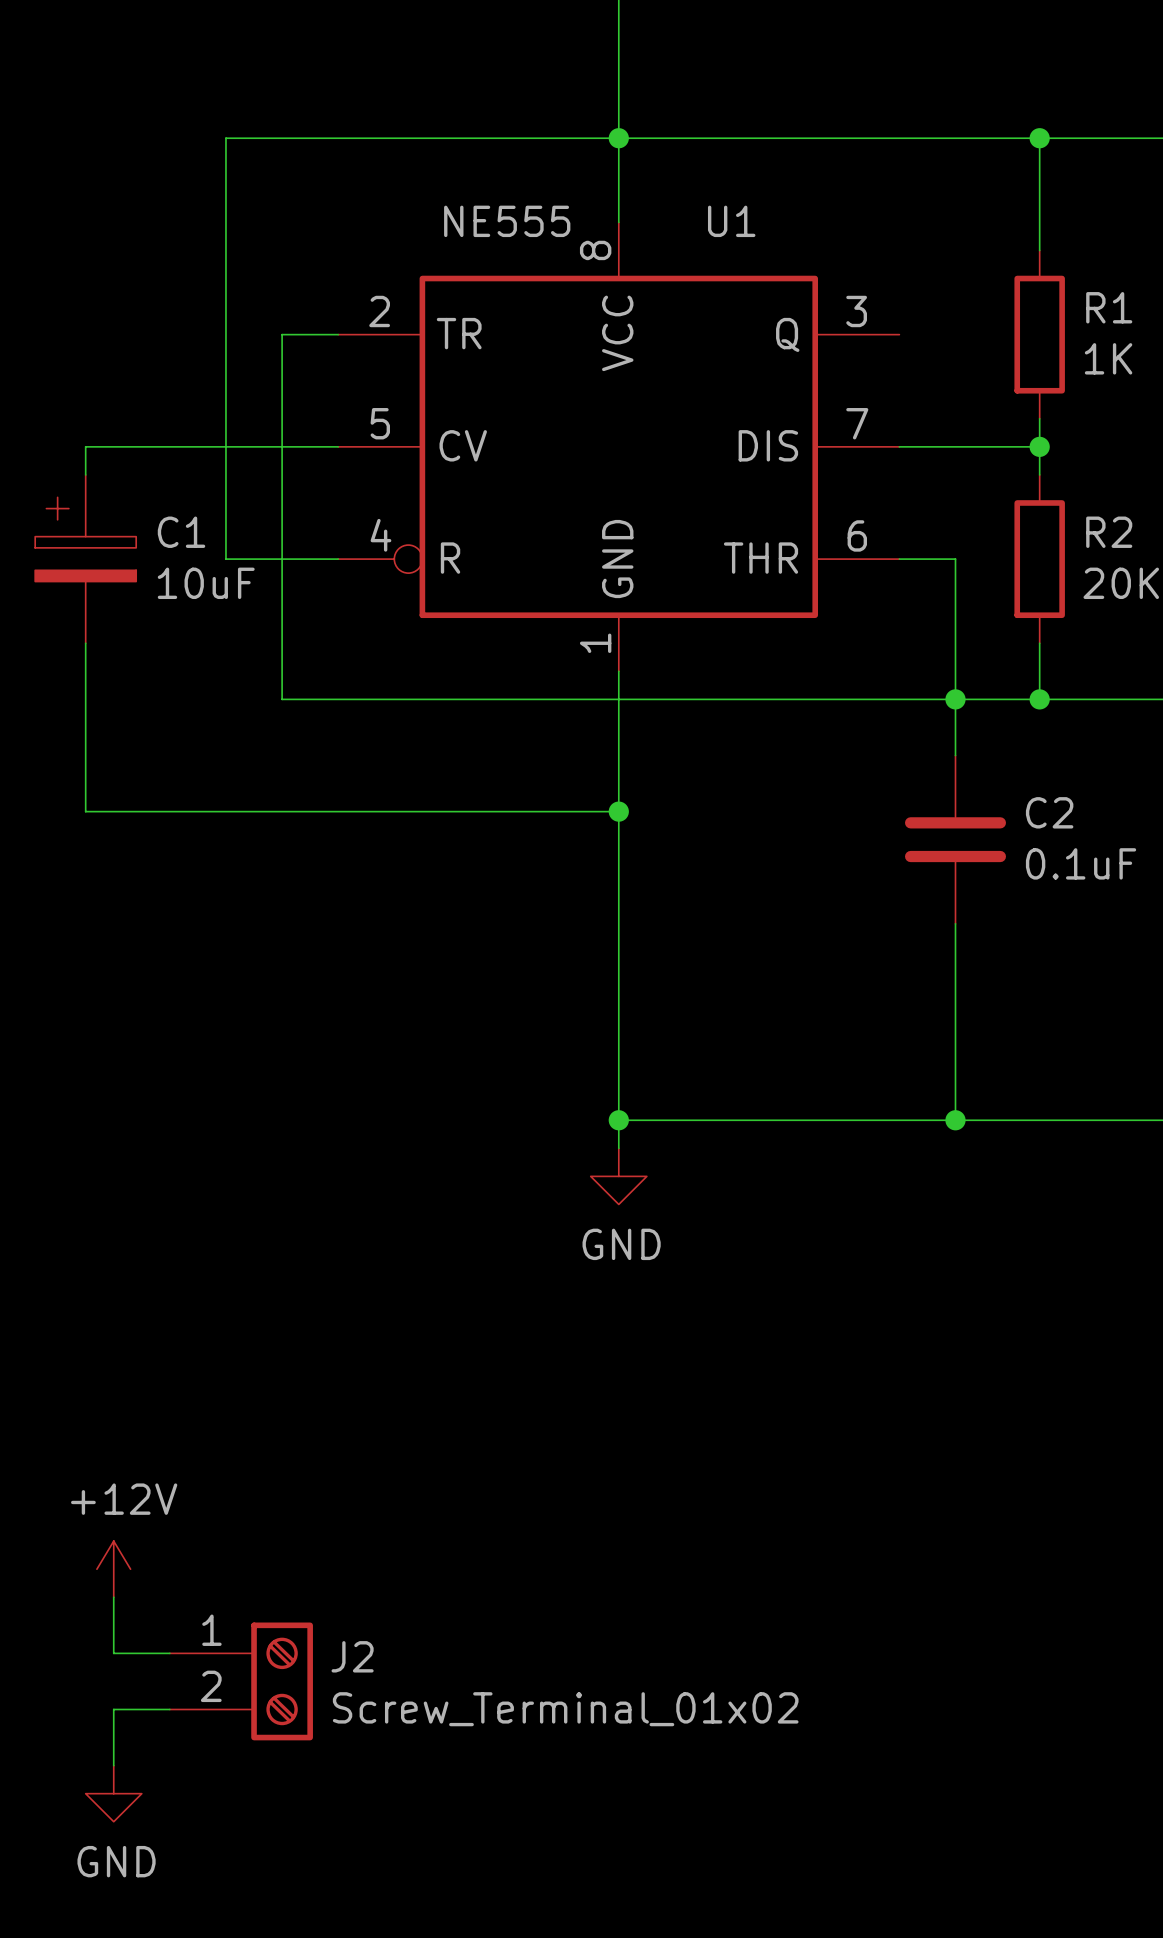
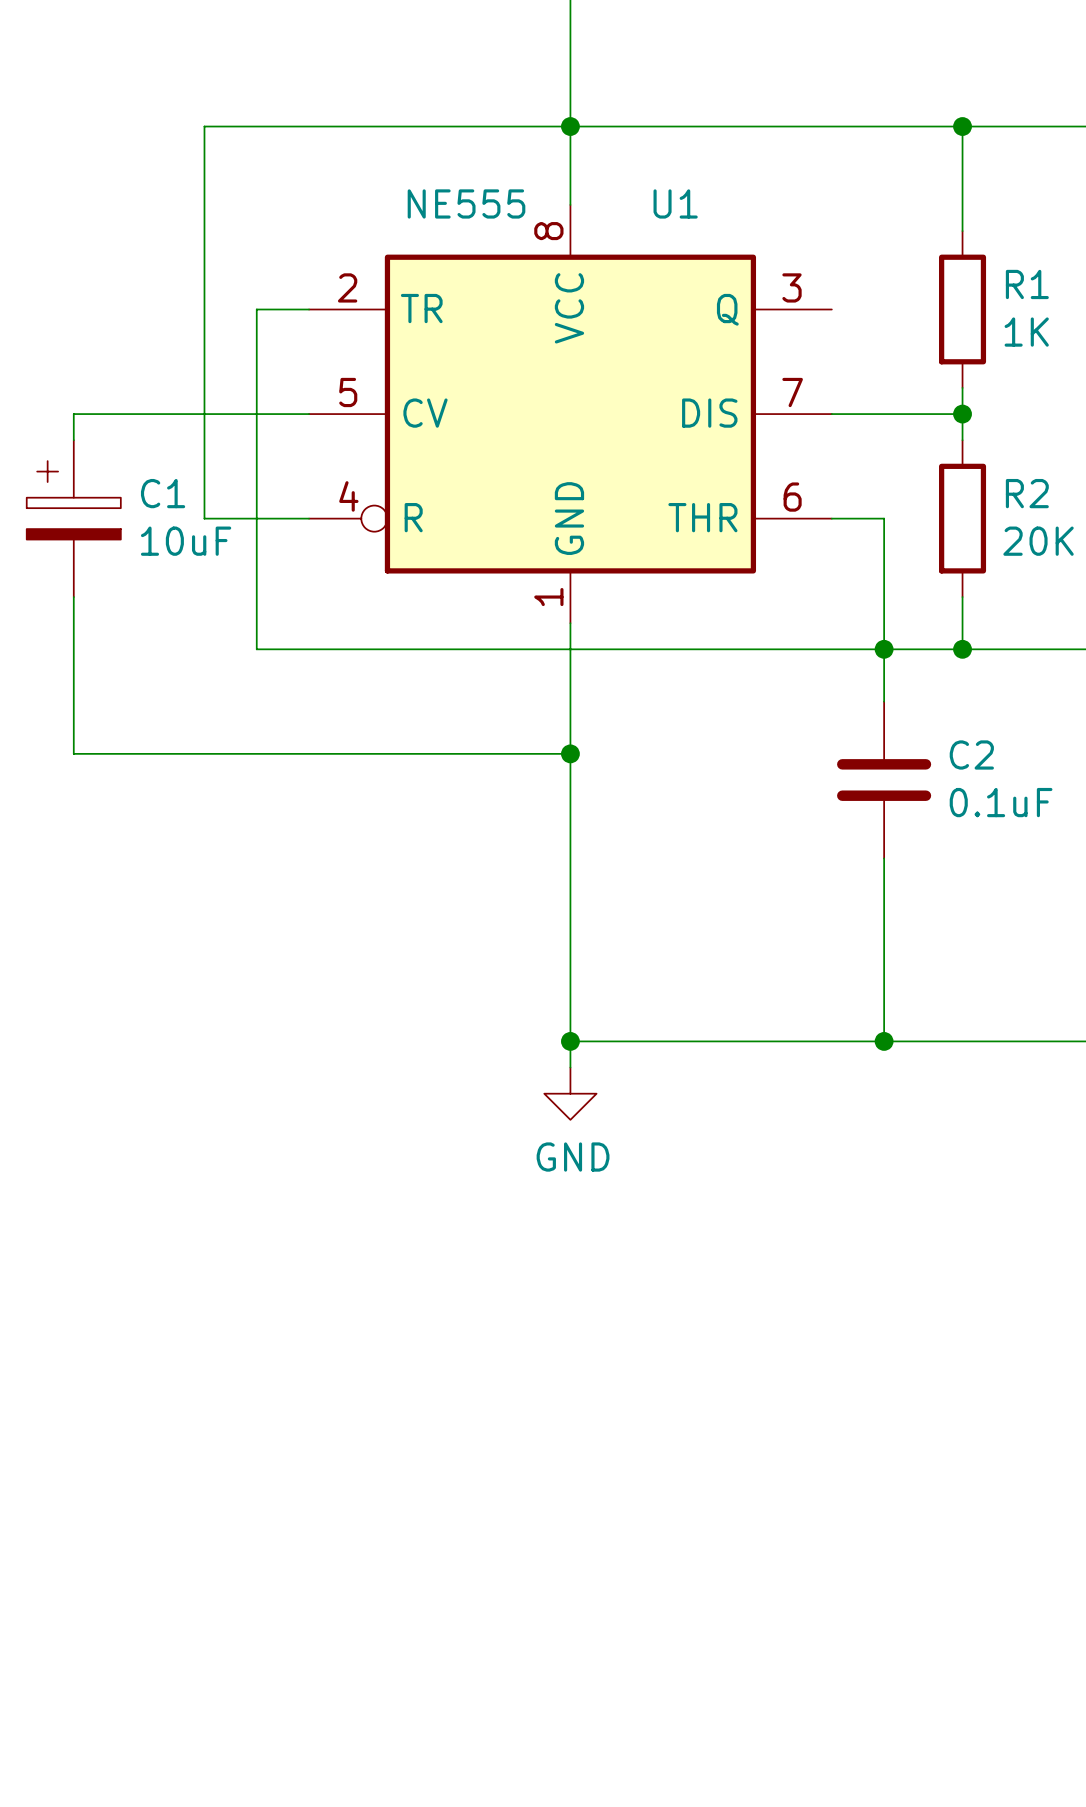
power symbol: +12V (113, 1569) -> none
wire: (113, 1597) (113, 1653) (169, 1653) -> none
J2: Screw_Terminal_01x02 (241, 1681) -> none
wire: (169, 1709) (113, 1709) (113, 1765) -> none
power symbol: GND (113, 1793) -> none

